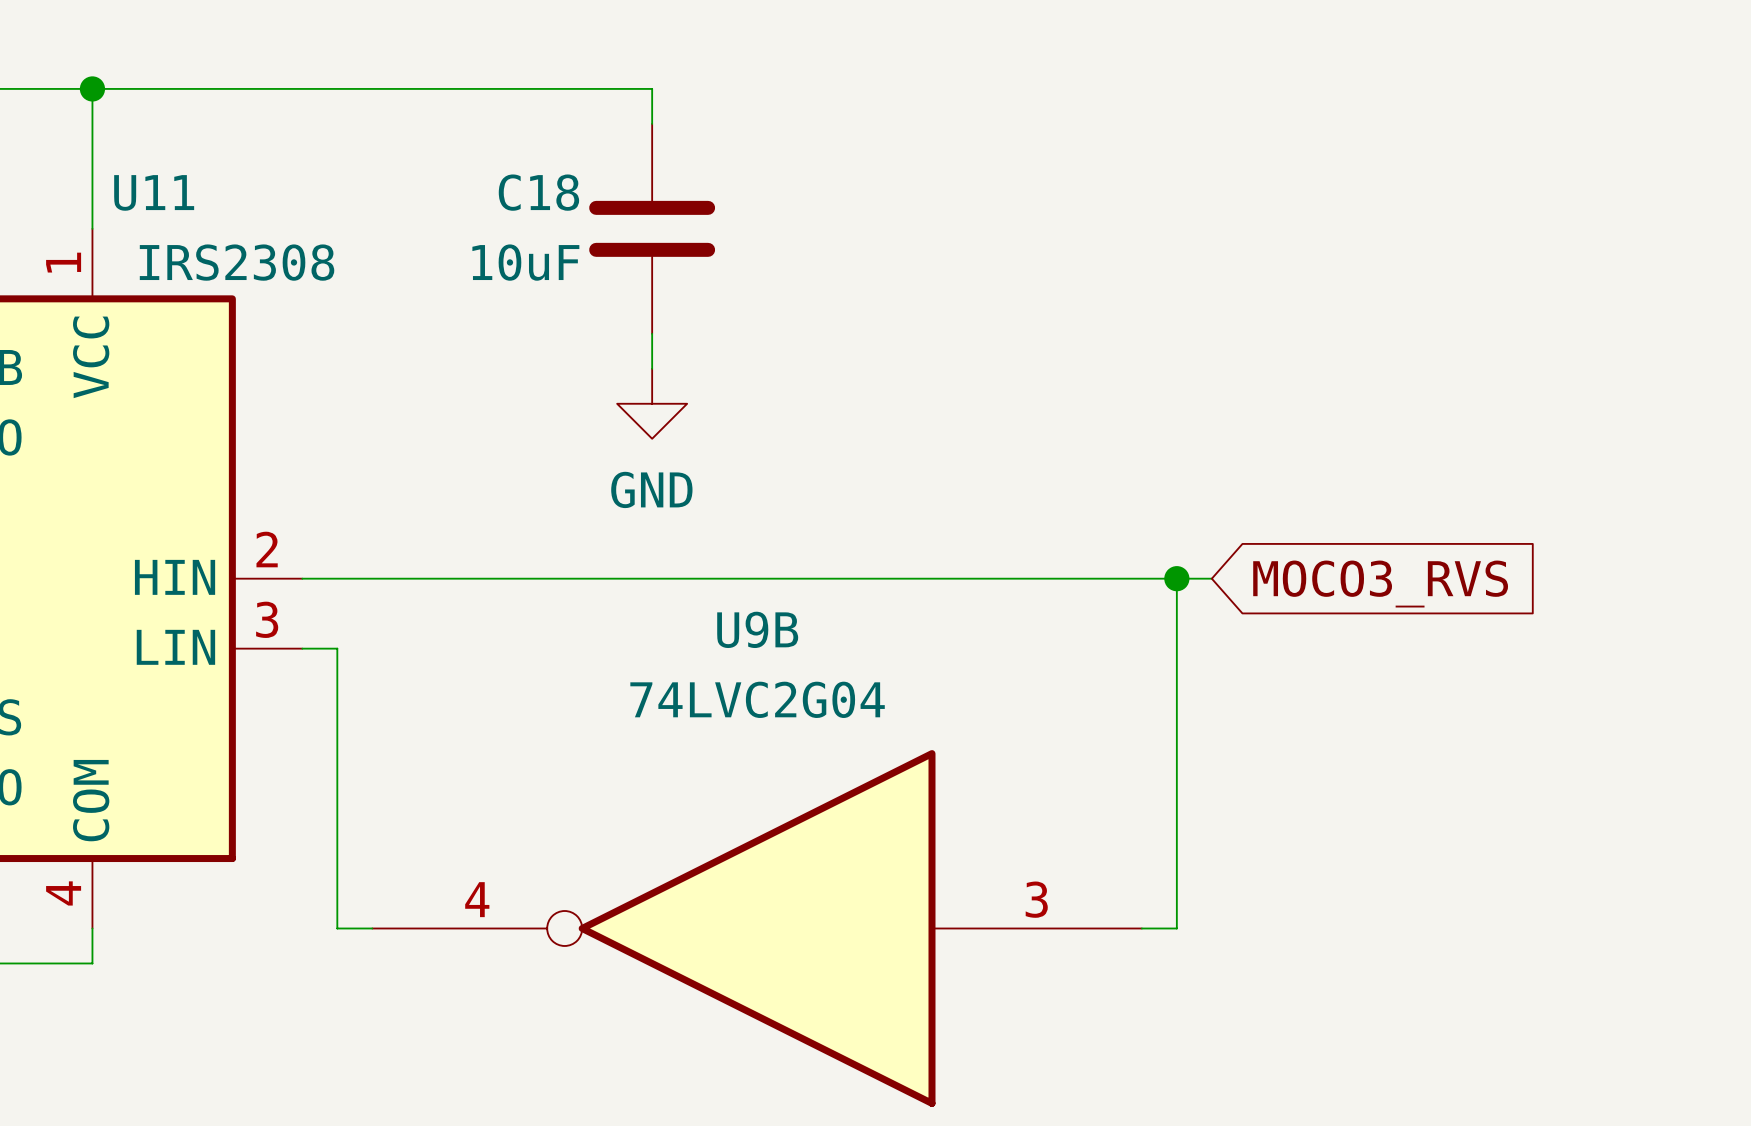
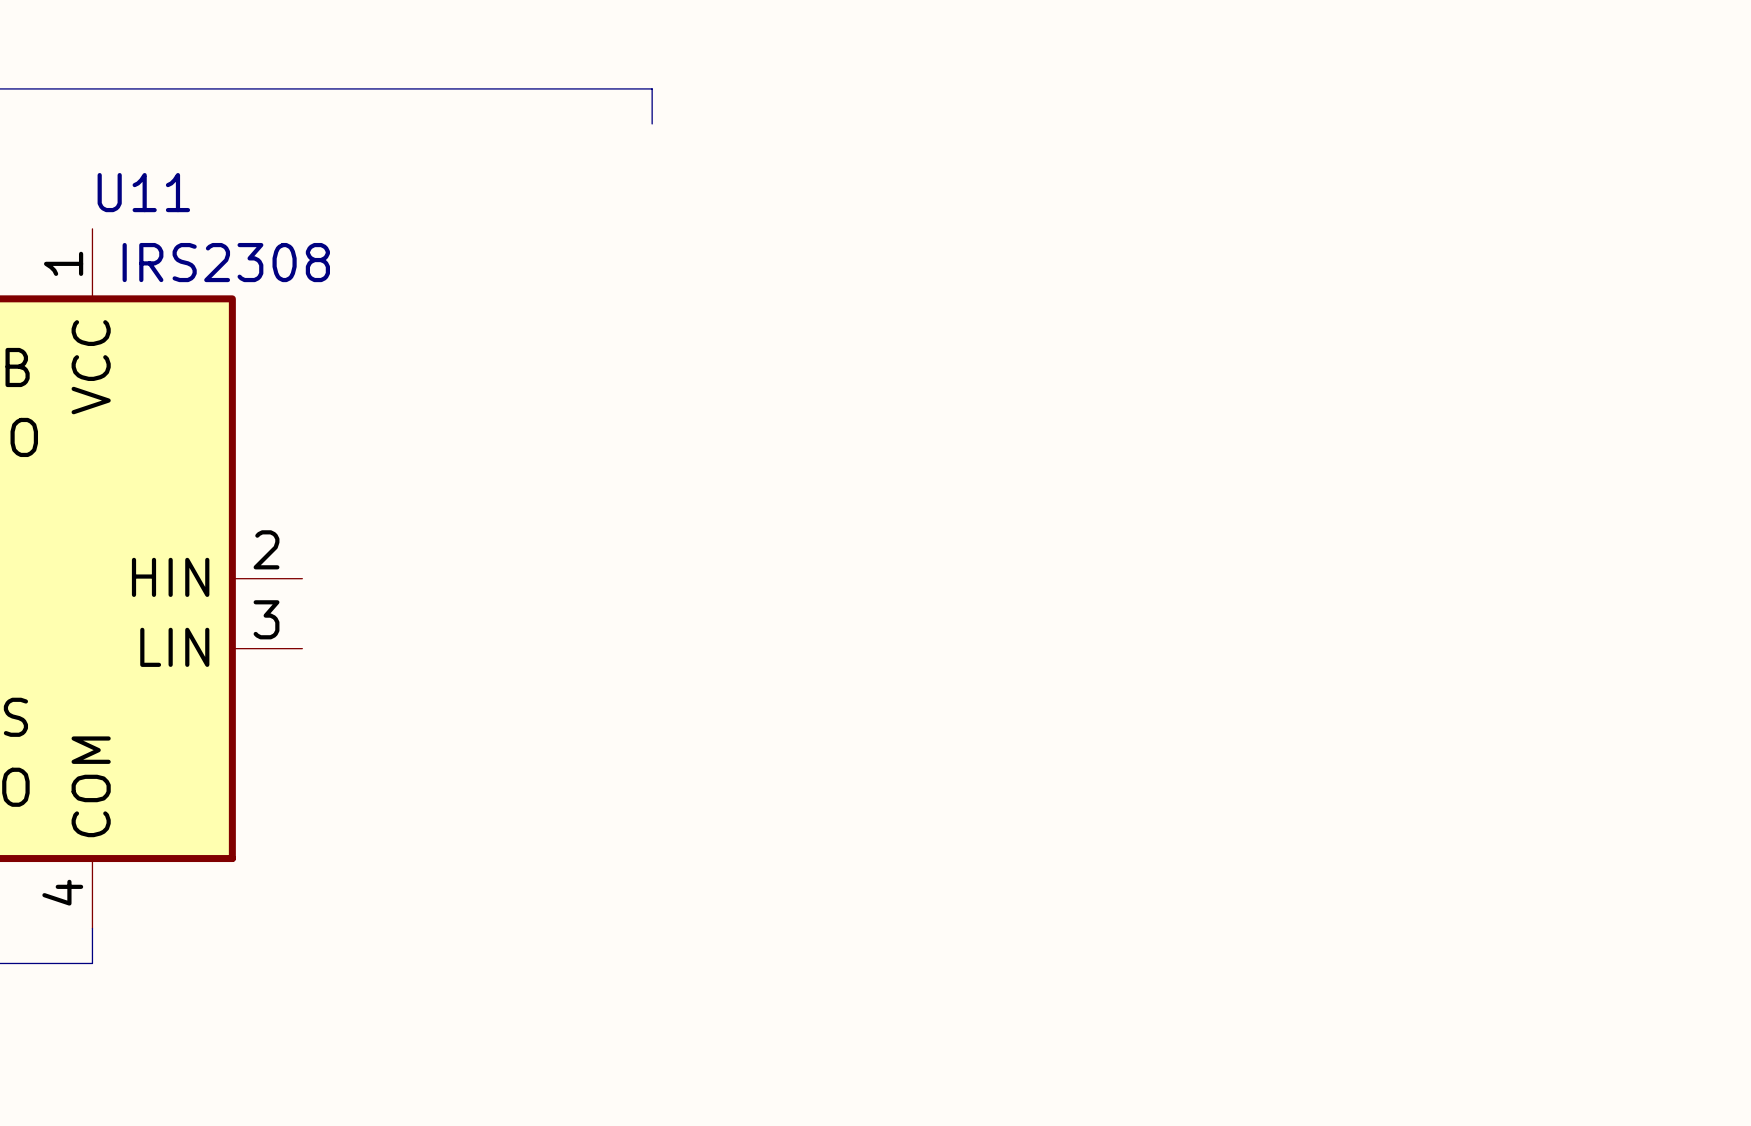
wire: (92, 88) (92, 228) -> none
junction: (92, 88) -> none
C18: 10uF (652, 228) -> none
wire: (652, 333) (652, 368) -> none
power symbol: GND (652, 403) -> none
wire: (302, 578) (1211, 578) -> none
wire: (1176, 578) (1176, 928) (1141, 928) -> none
junction: (1176, 578) -> none
global label: MOCO3_RVS (1380, 584) -> none
wire: (302, 648) (337, 648) (337, 928) (372, 928) -> none
U9B: 74LVC2G04 (757, 928) -> none

